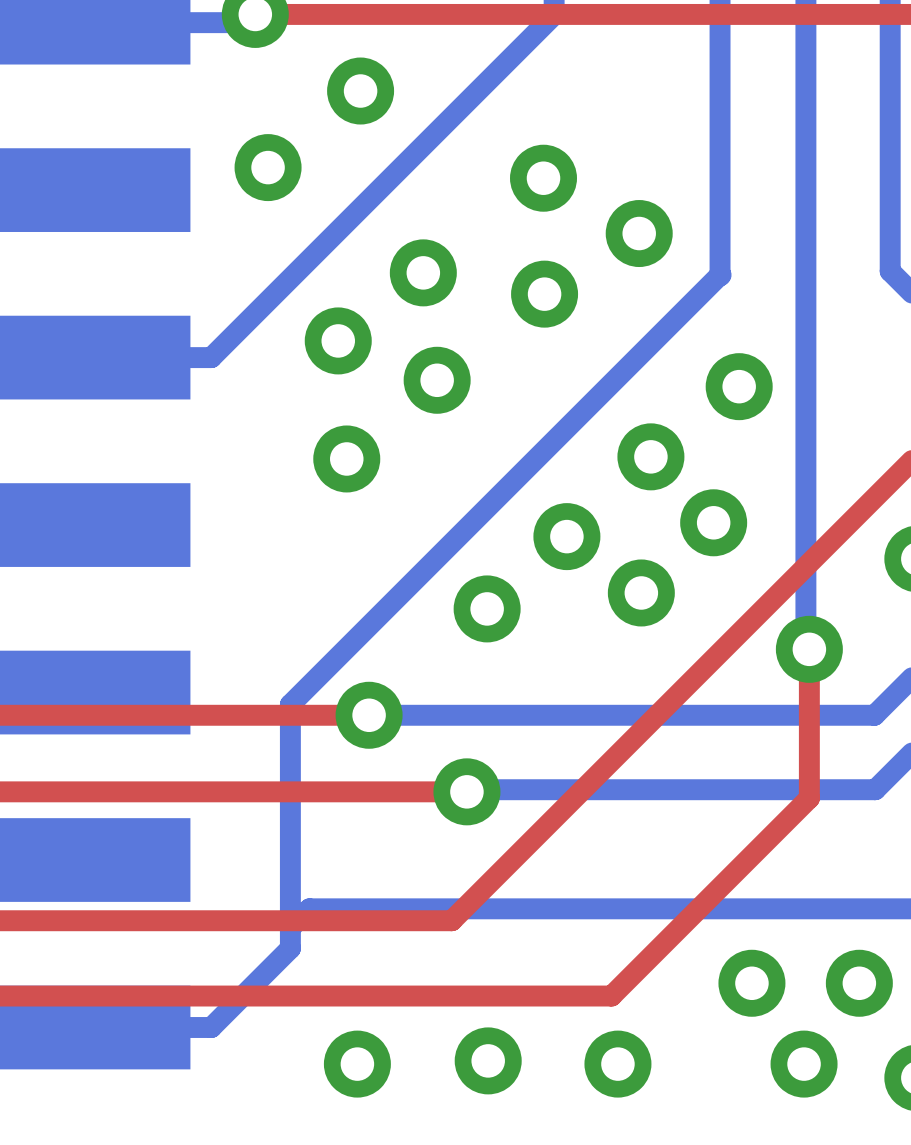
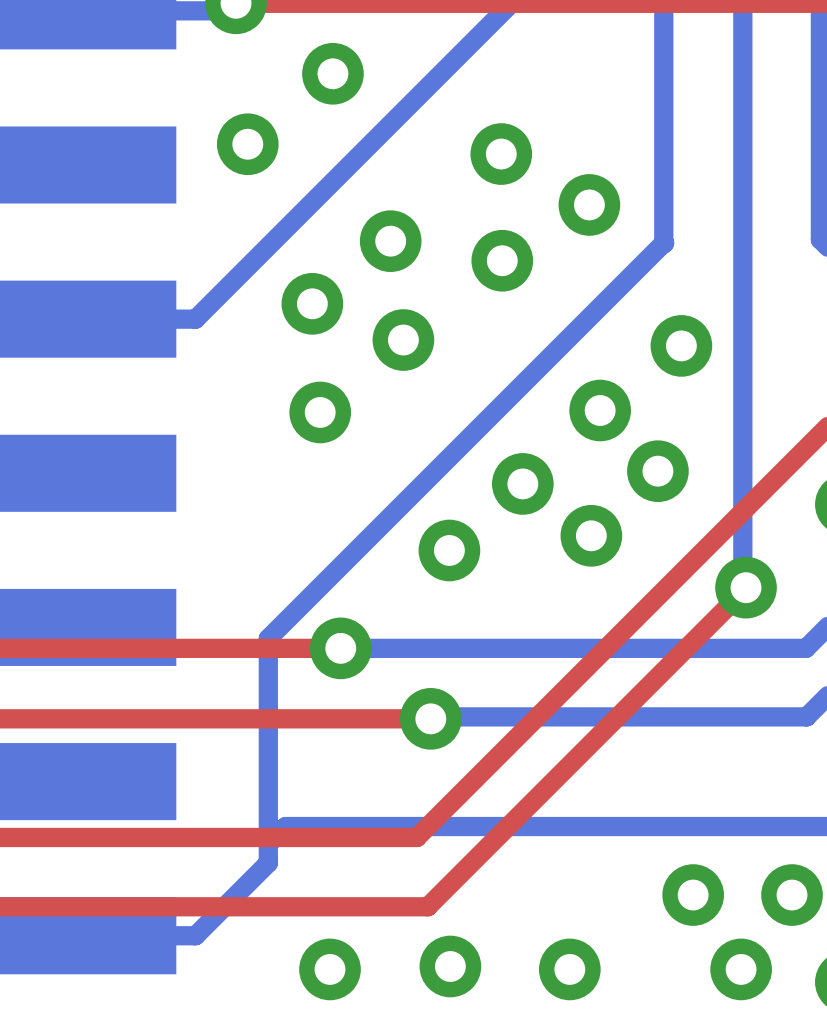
top track: (809, 650) (809, 798) (611, 996) (463, 996) -> (746, 588) (427, 906)

